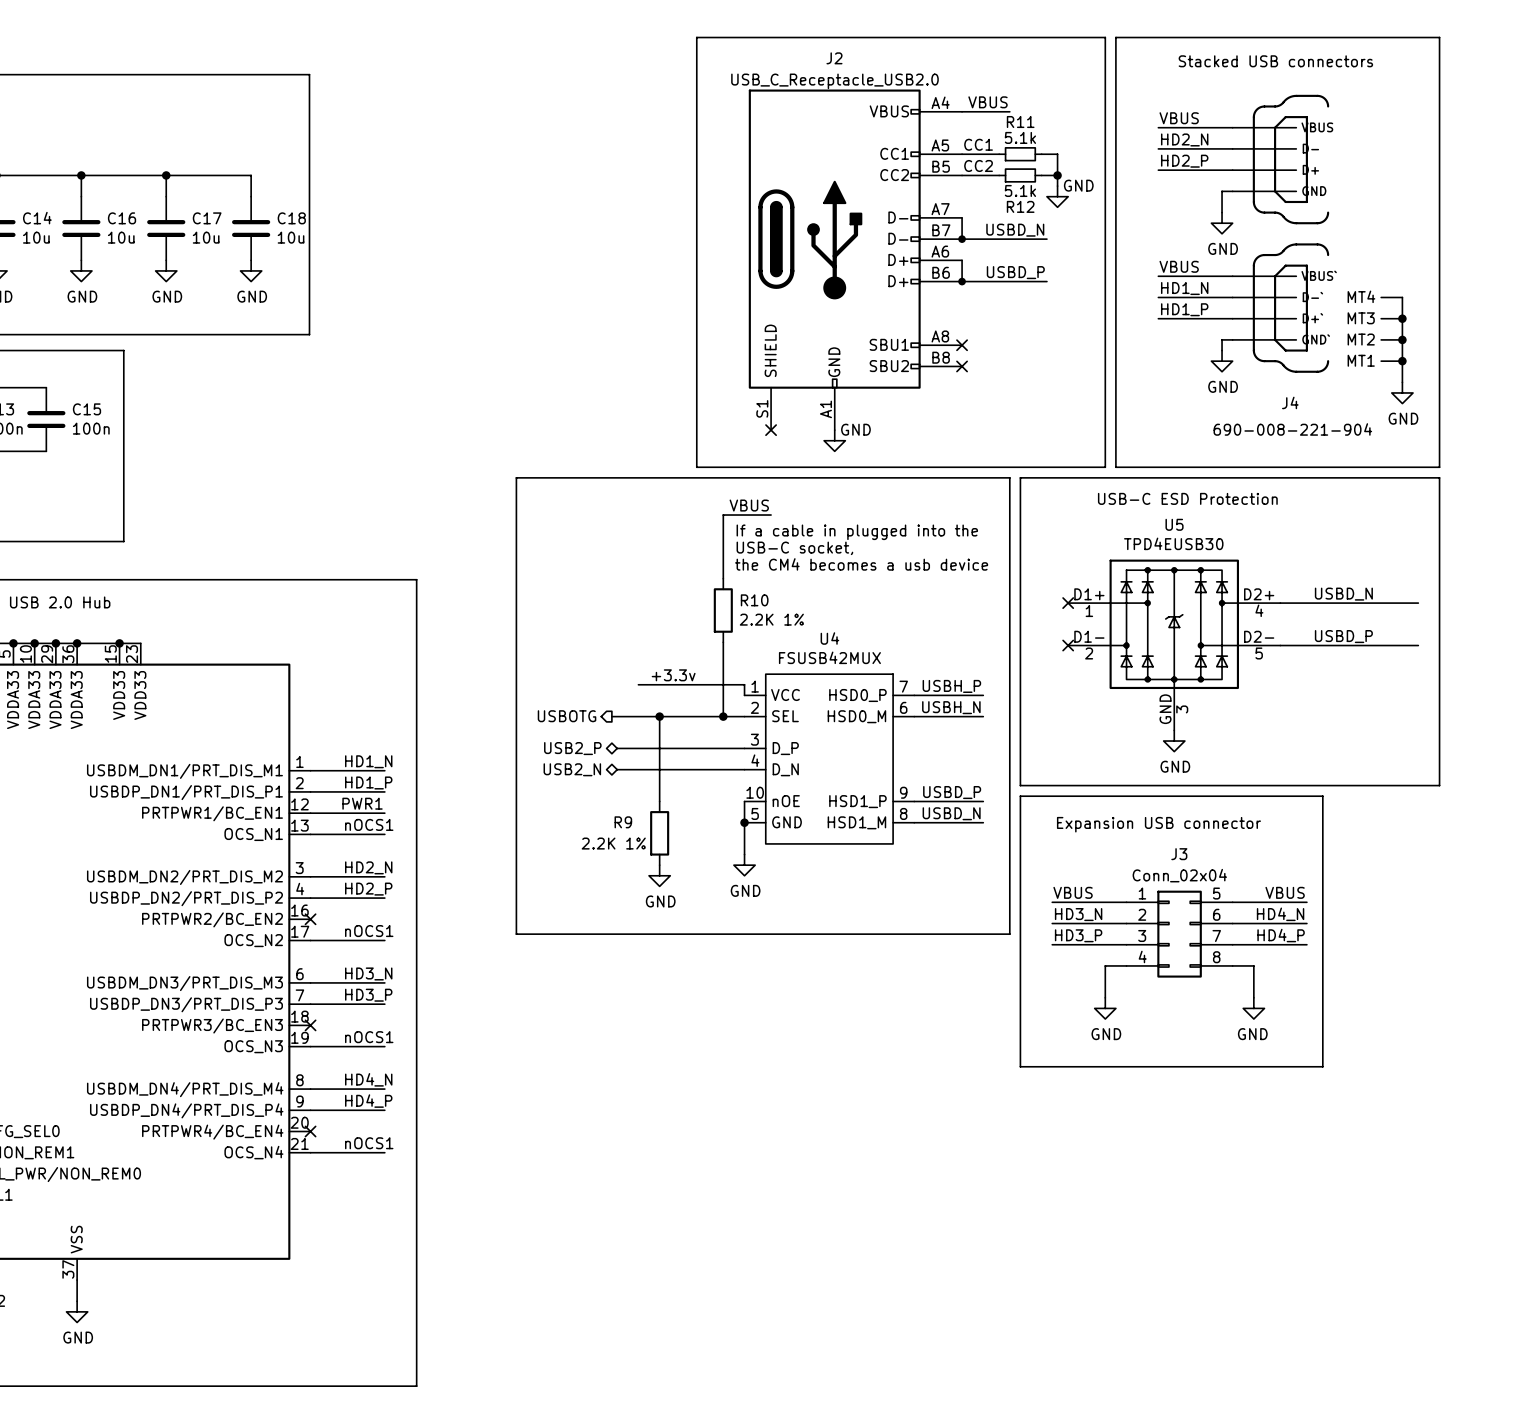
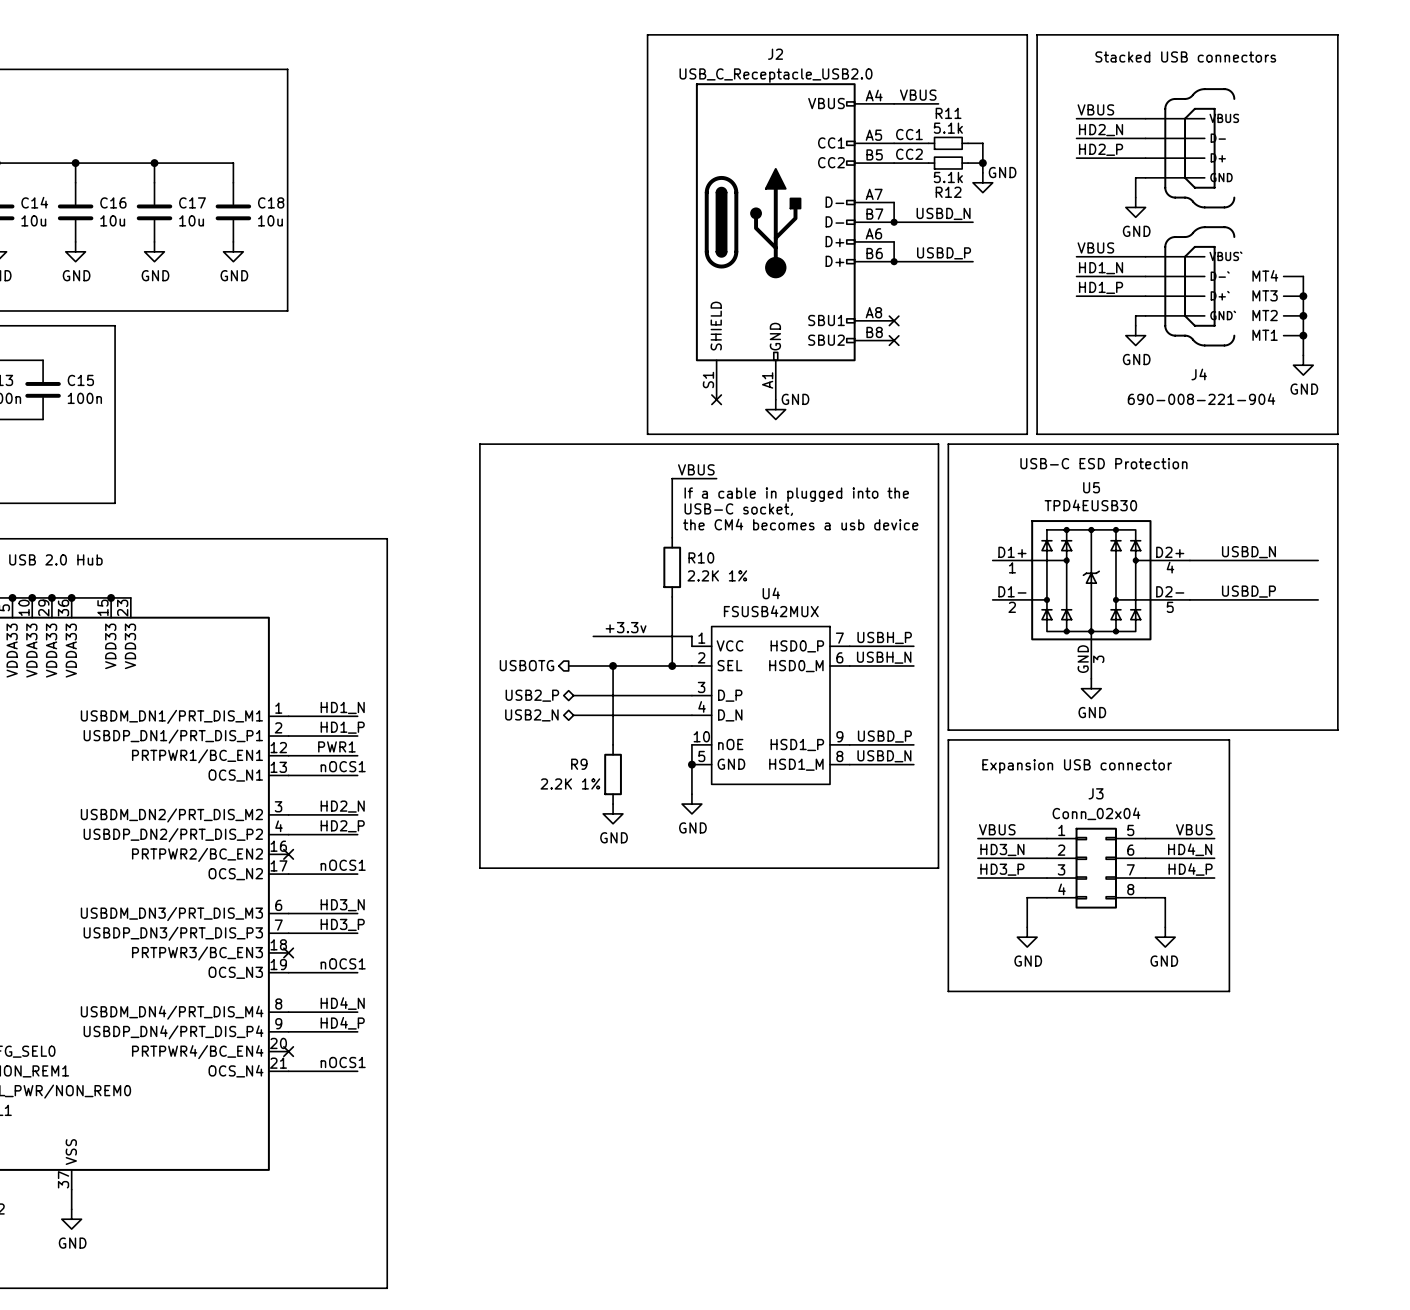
no-connect mark: (1068, 603) -> none
no-connect mark: (1068, 645) -> none

